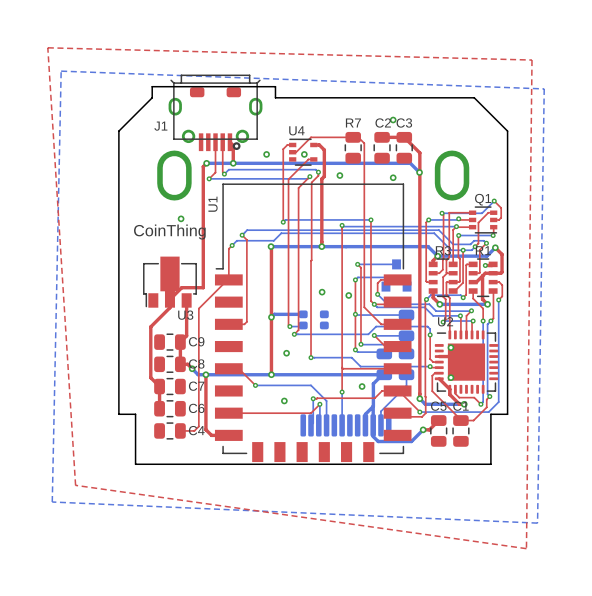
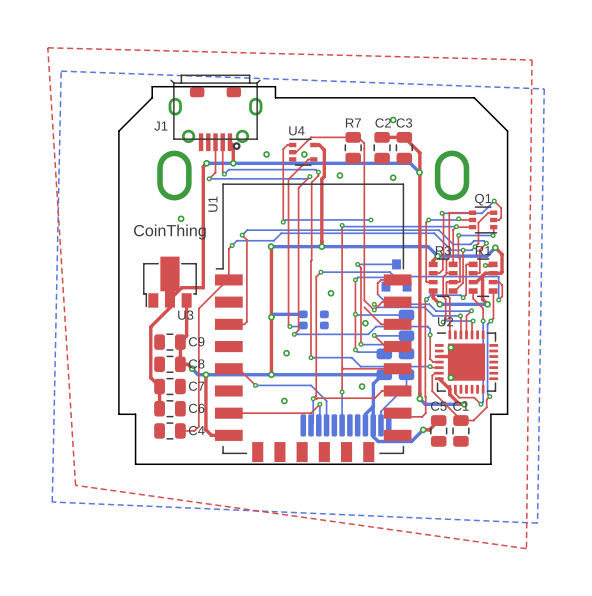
top track: (370, 219) (370, 301) (374, 304) (395, 304) (397, 302) -> none
top track: none -> (321, 272) (316, 276) (316, 395) (313, 398)
via: none -> (321, 272)
via: (322, 292) -> none
via: none -> (331, 293)
via position: (377, 294) -> (374, 309)
via: (348, 295) -> none
bottom track: (498, 299) (498, 402) (488, 412) (419, 412) -> (498, 299) (498, 276) (394, 276) (389, 272) (321, 272)
top track: (364, 300) (364, 307) -> (364, 300) (373, 309) (382, 302) (397, 302)
via: none -> (365, 323)
top track: (397, 390) (419, 411) -> none
via: (419, 412) -> none

